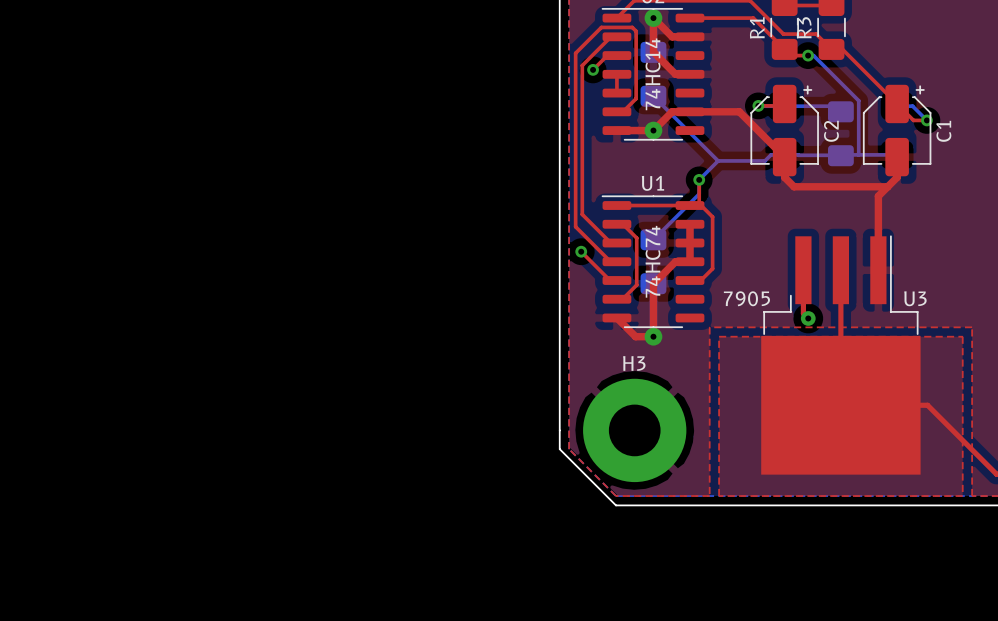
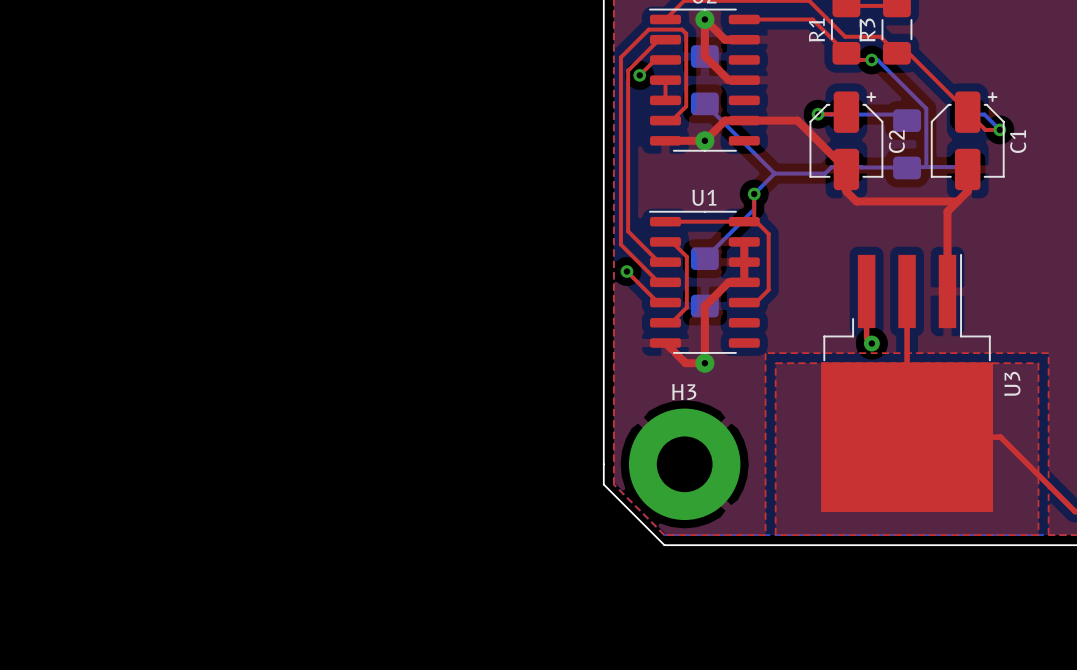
text: 74HC14 (652, 74) -> none
text: 74HC74 (652, 261) -> none
text: 7905 (746, 298) -> none
U3 name rotation: 0° (915, 298) -> 90° counterclockwise (1012, 383)
U3 name position: U3 (915, 298) -> U3 (1012, 383)

